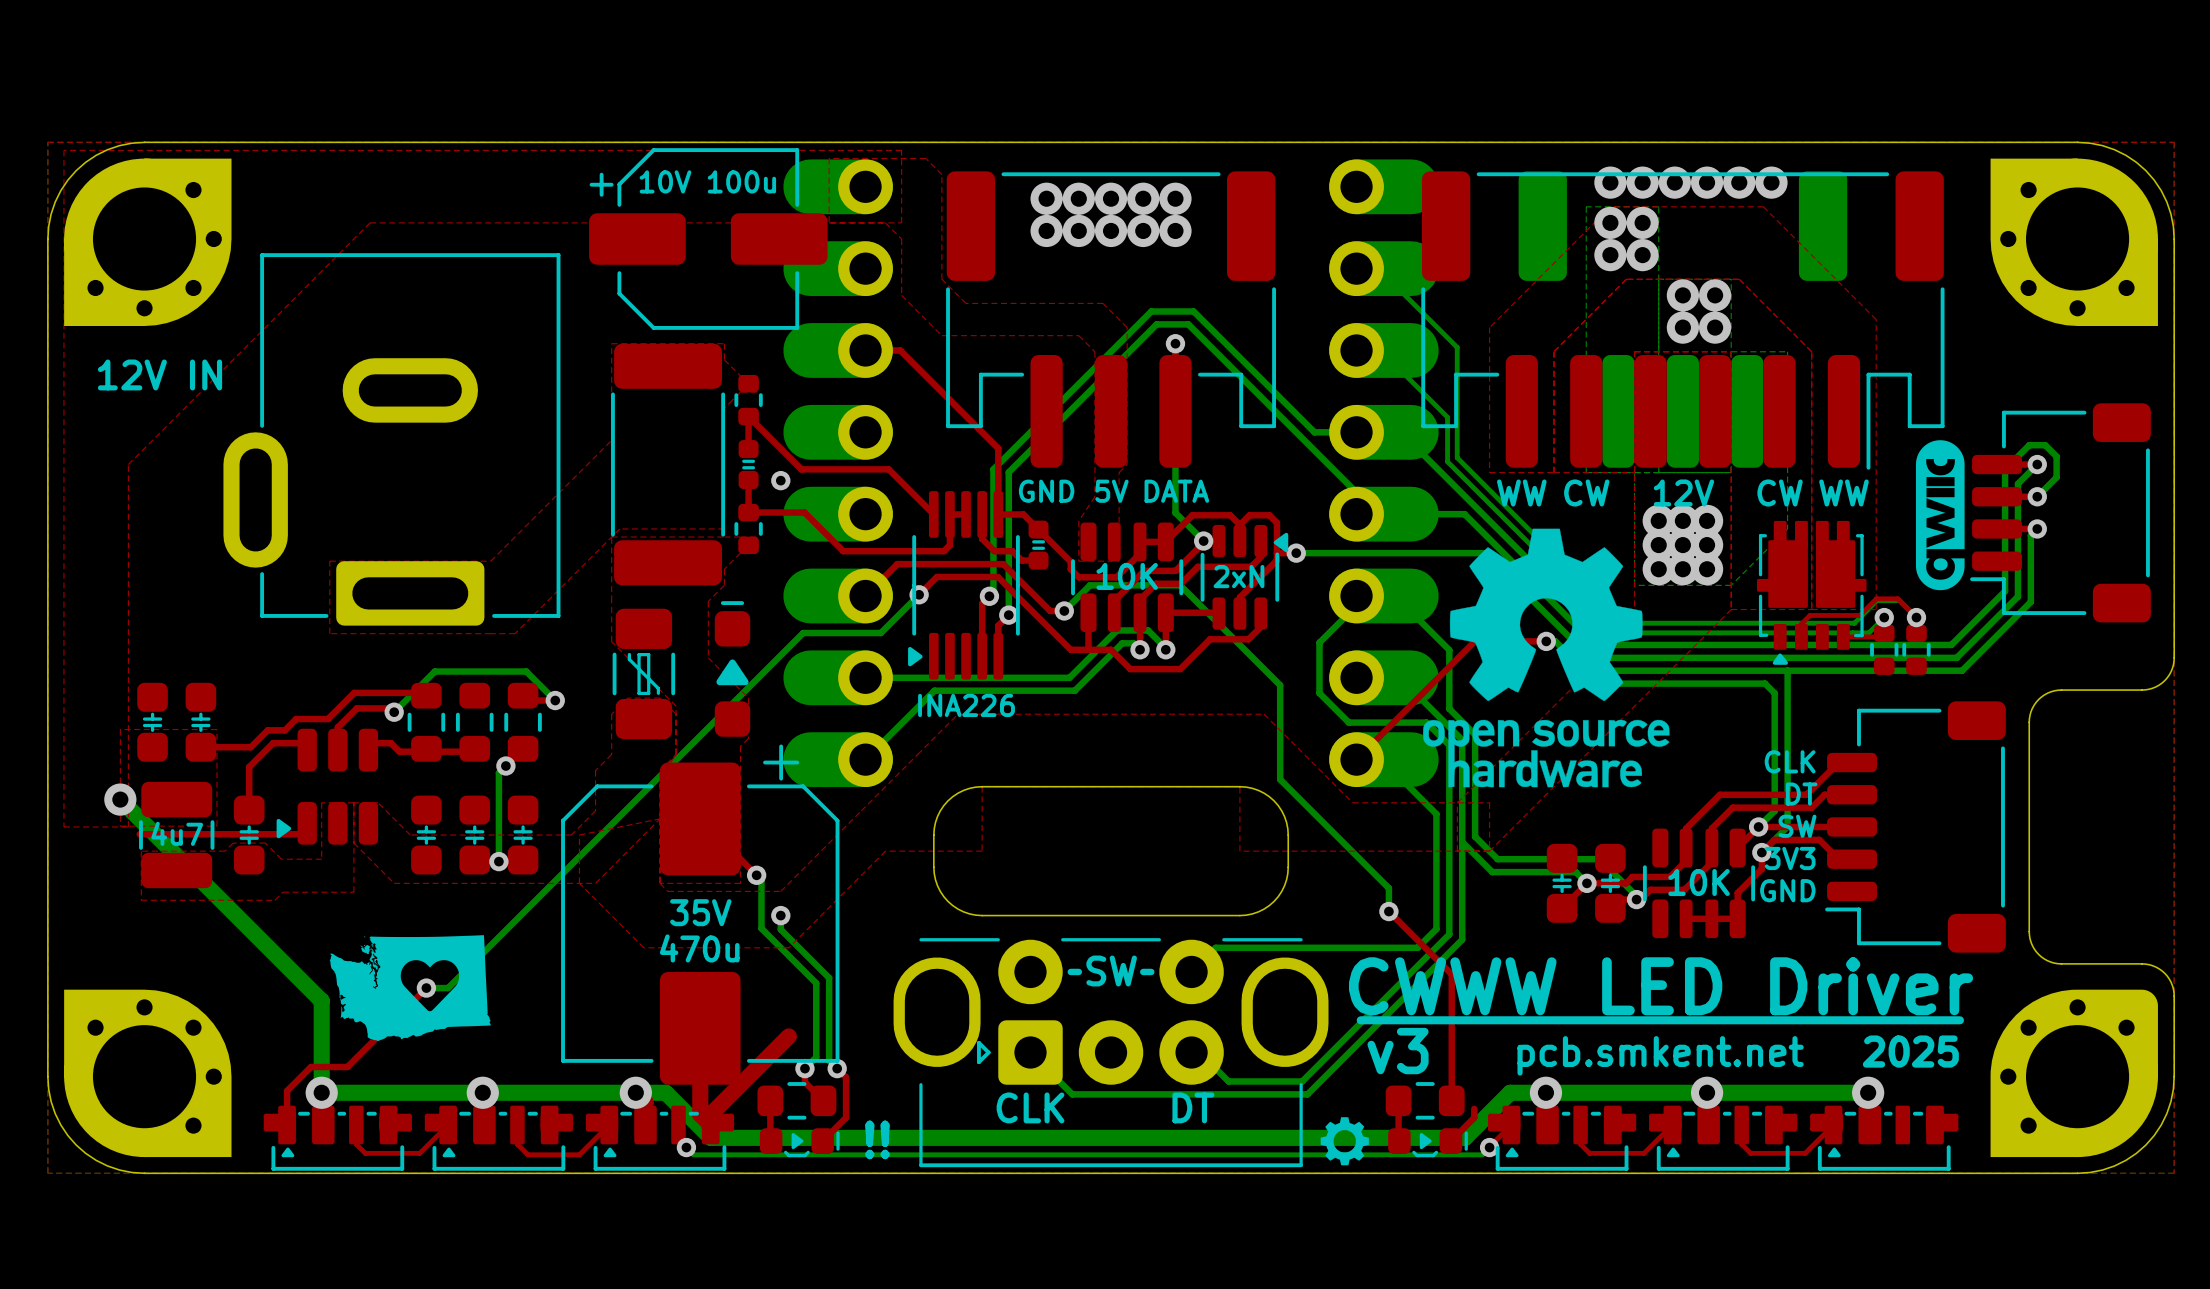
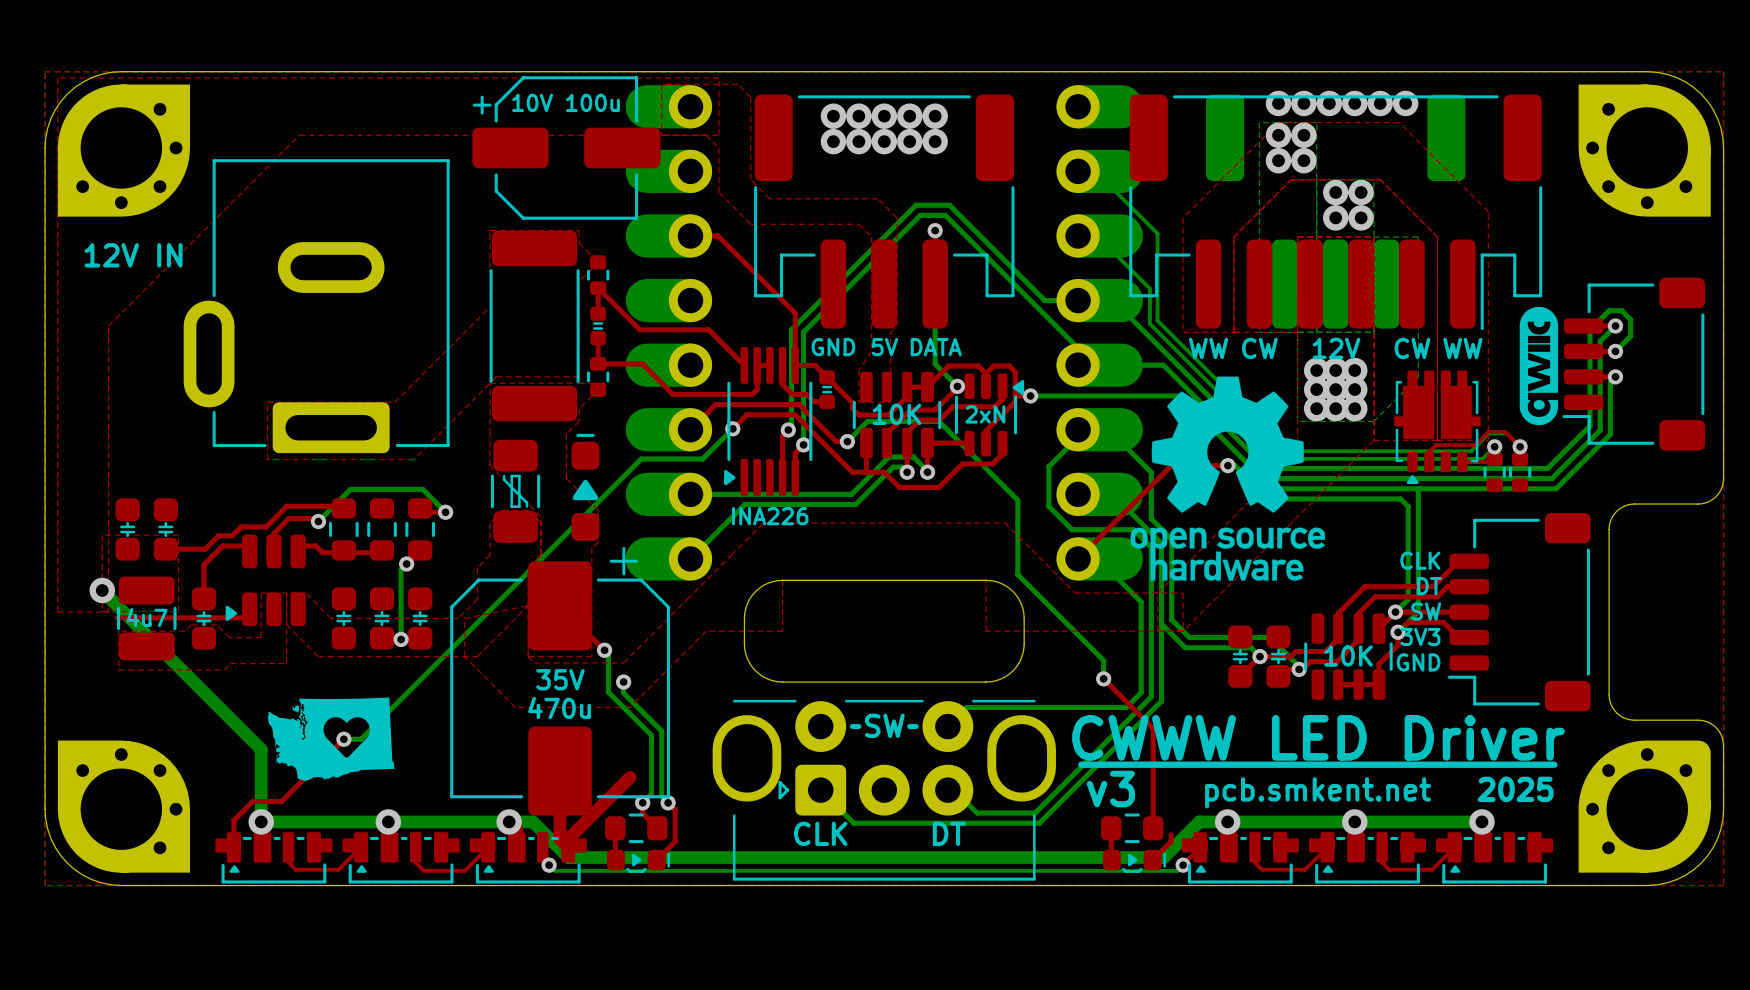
via: (780, 480) -> none
drawing: [1320, 1117, 1369, 1166] -> none
text: !! (877, 1139) -> none

